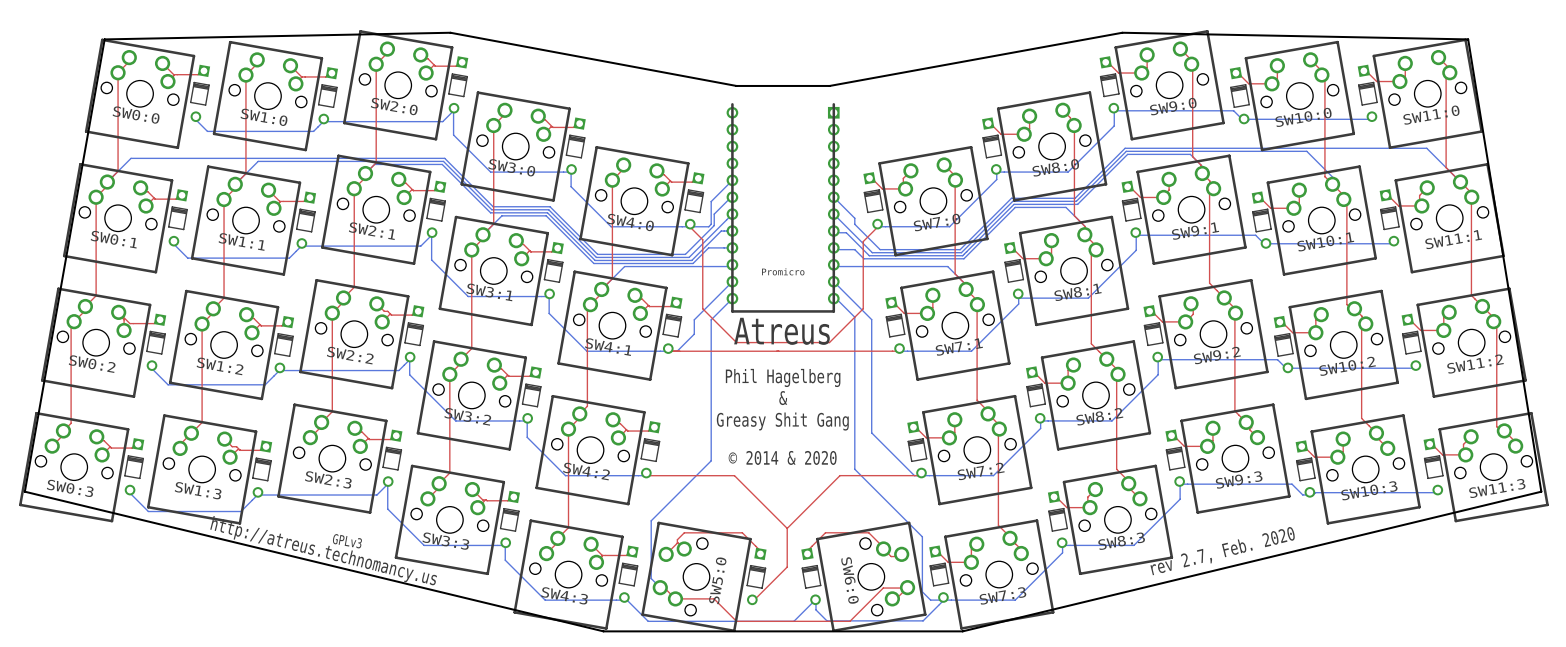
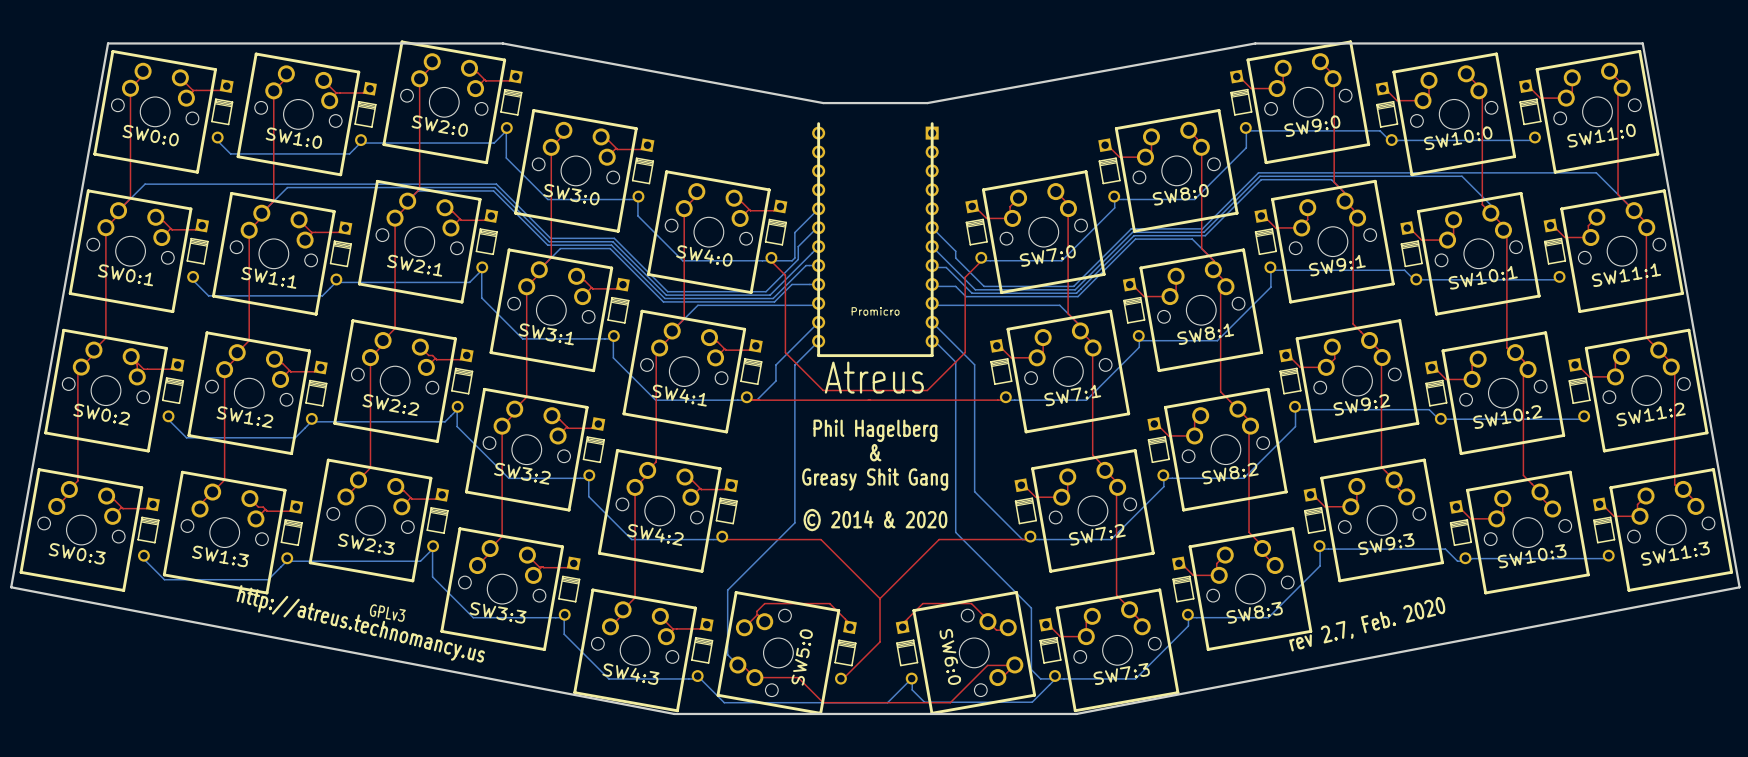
board edge: (450, 32) (104, 39) (24, 491) (603, 631) -> (502, 43) (108, 43) (11, 587) (674, 713)
board edge: (1122, 32) (1468, 39) (1541, 491) (962, 631) -> (1255, 43) (1642, 43) (1739, 587) (1076, 713)

